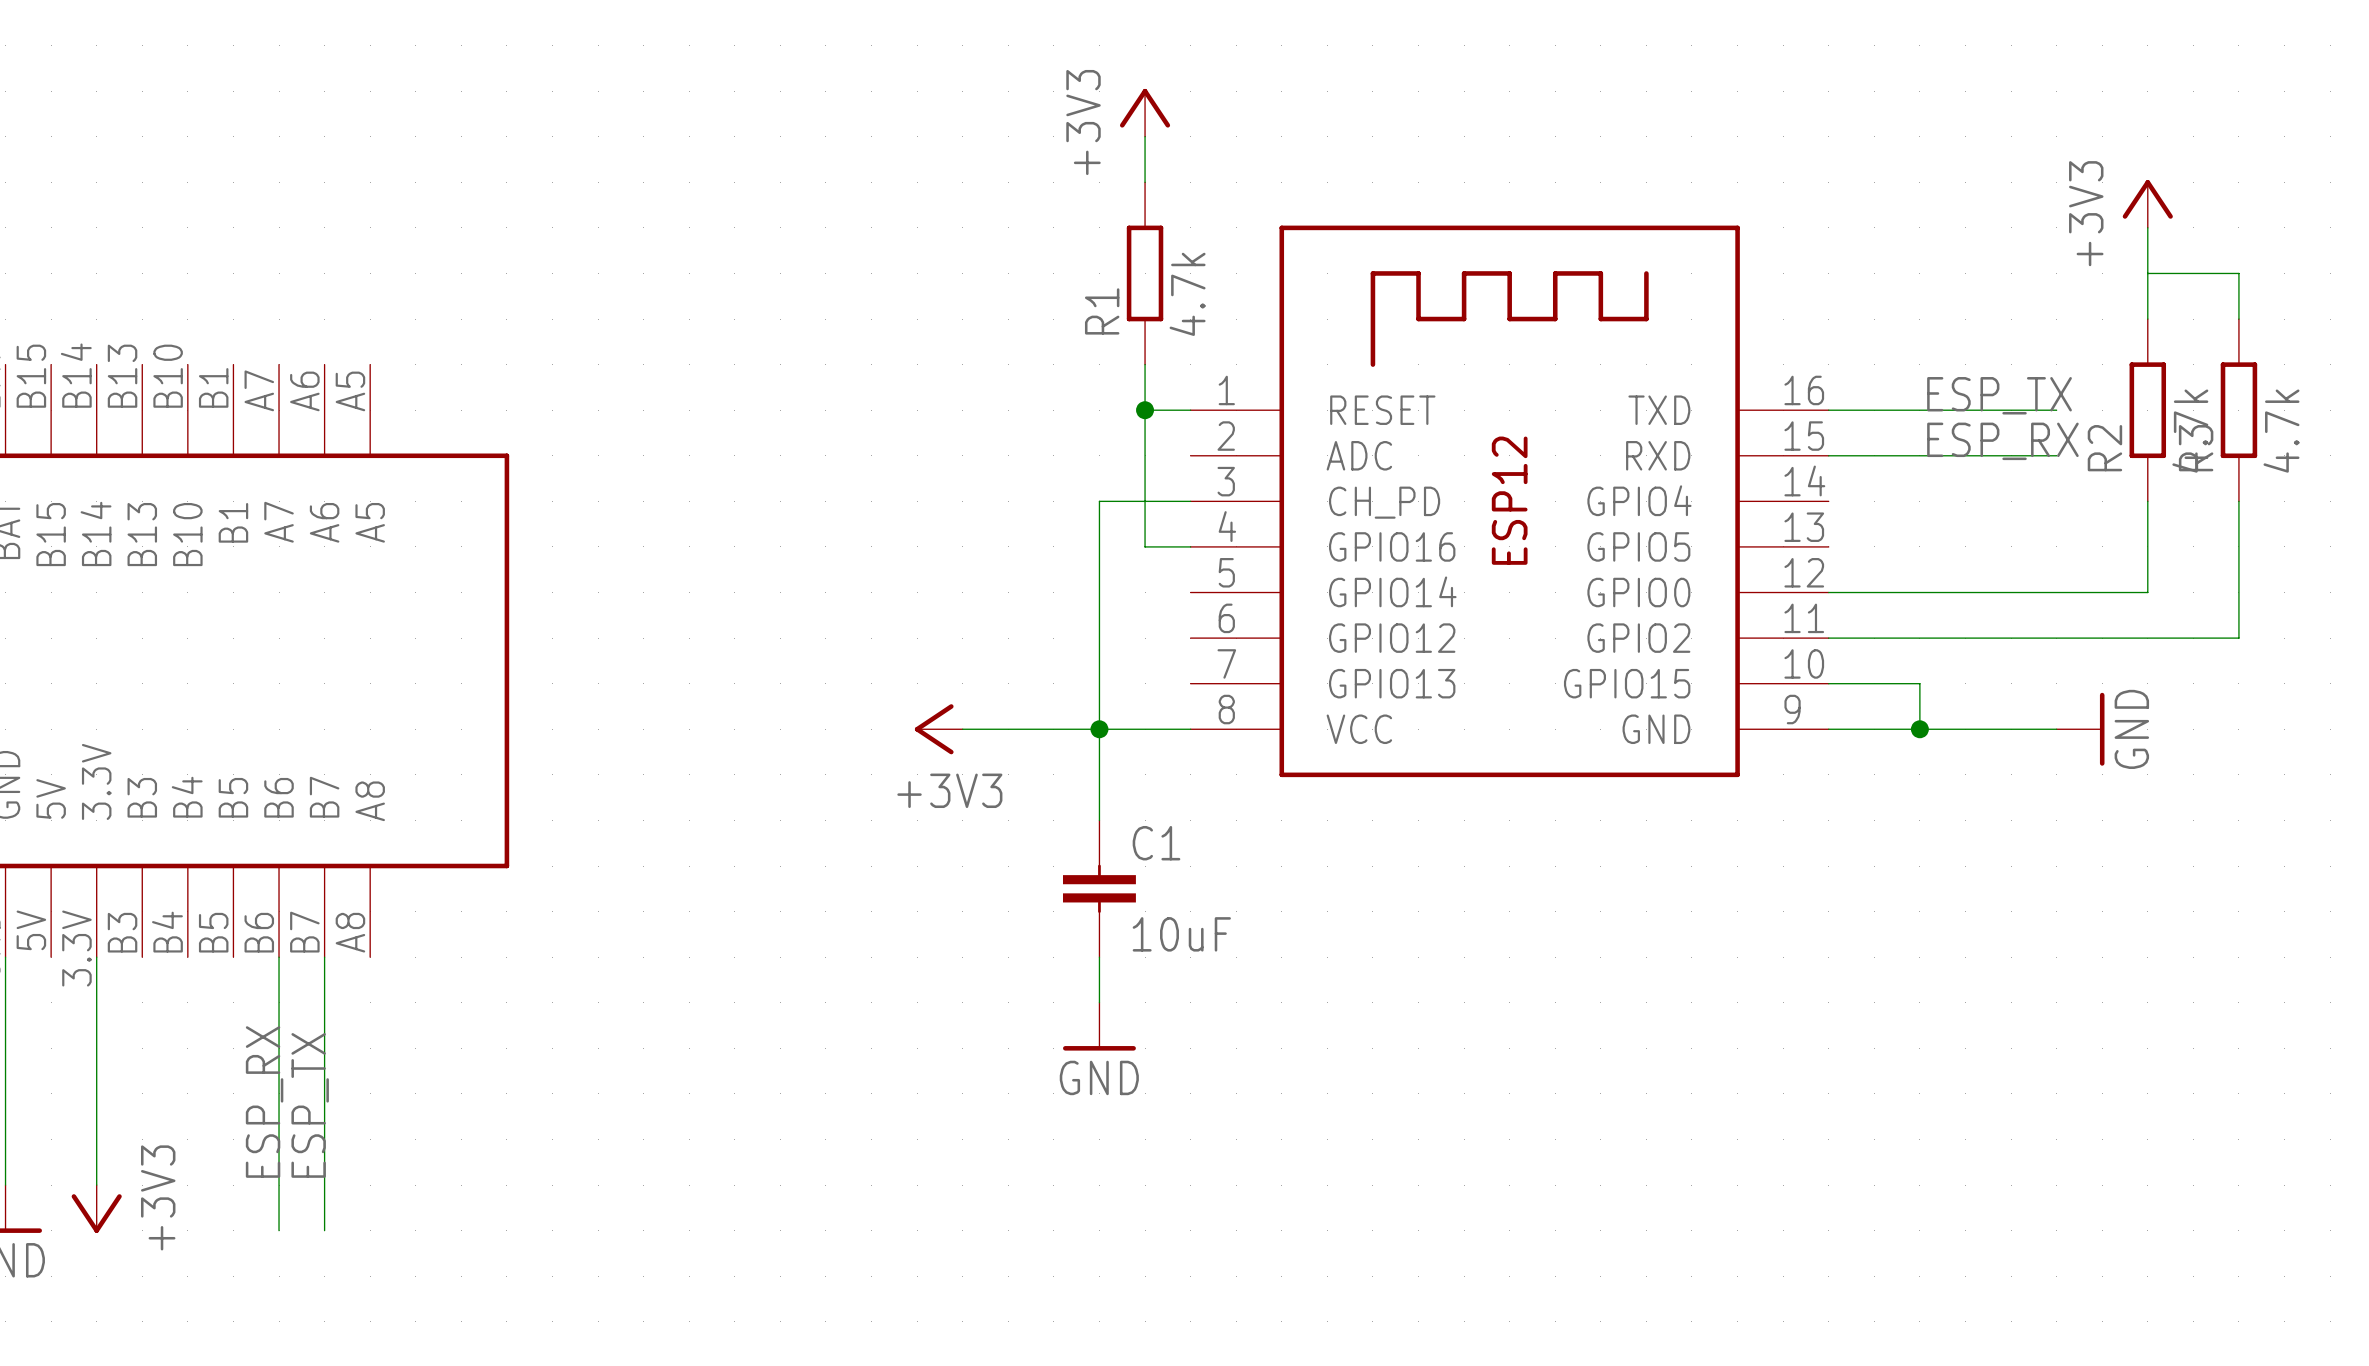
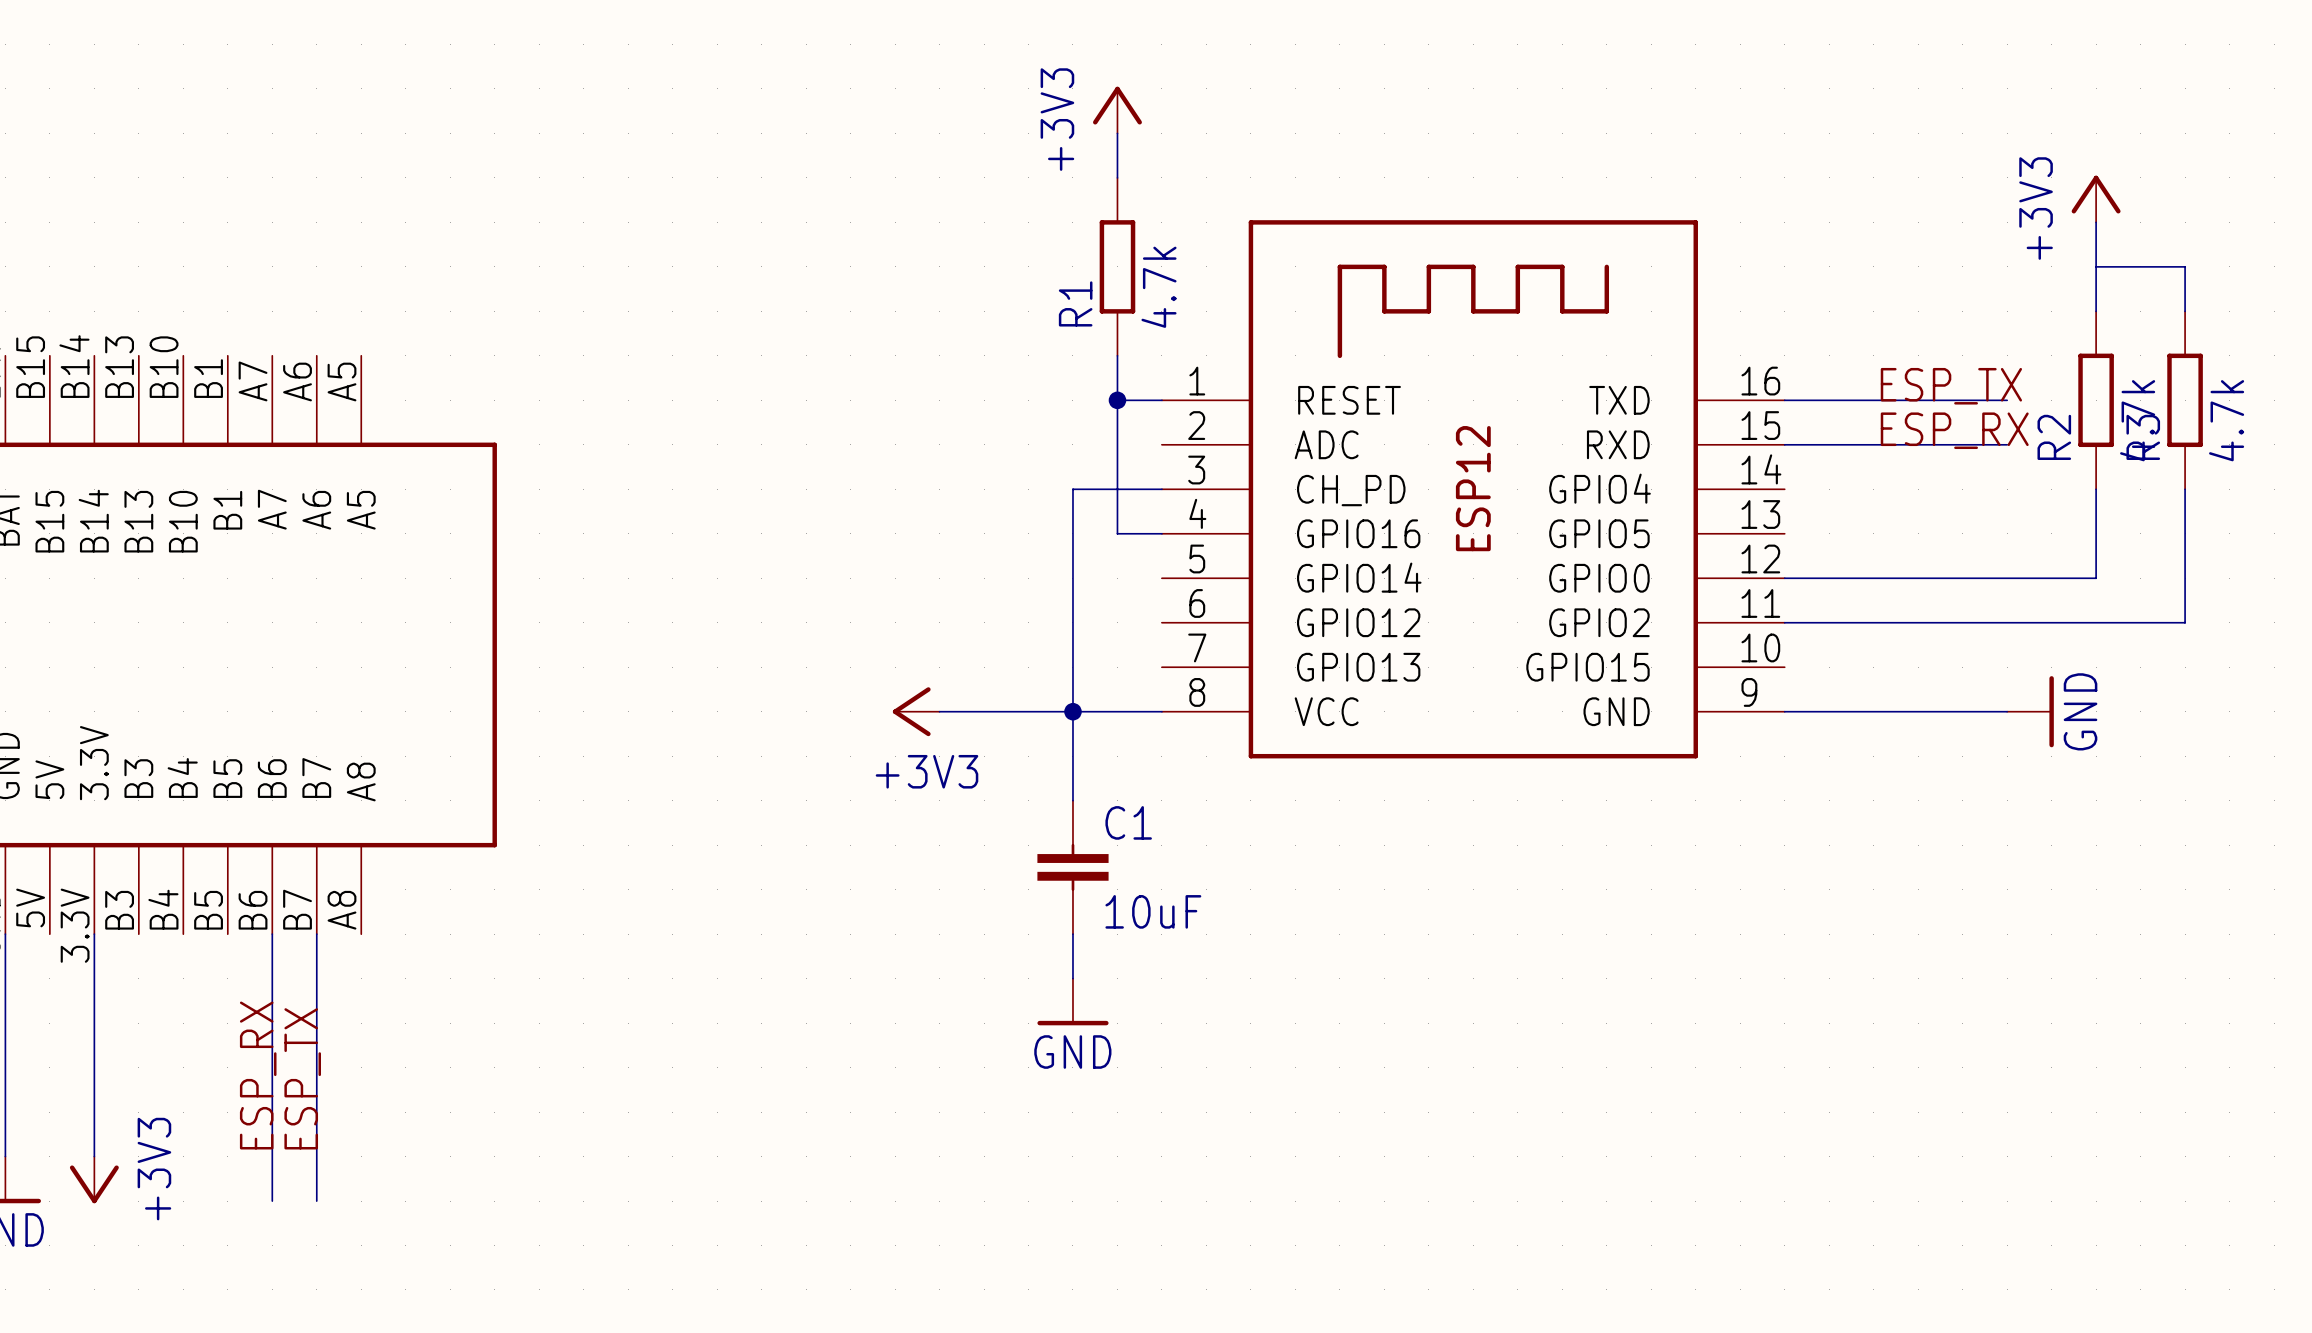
wire: (1828, 683) (1919, 683) (1919, 729) -> none
junction: (1919, 729) -> none

